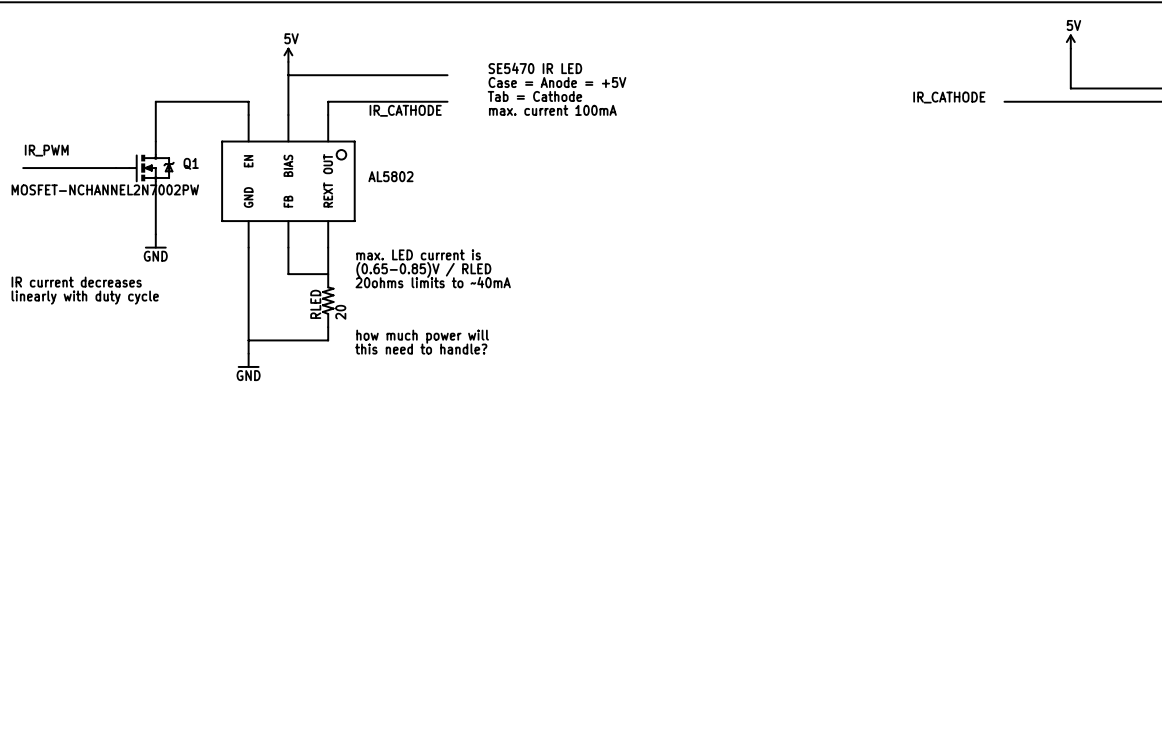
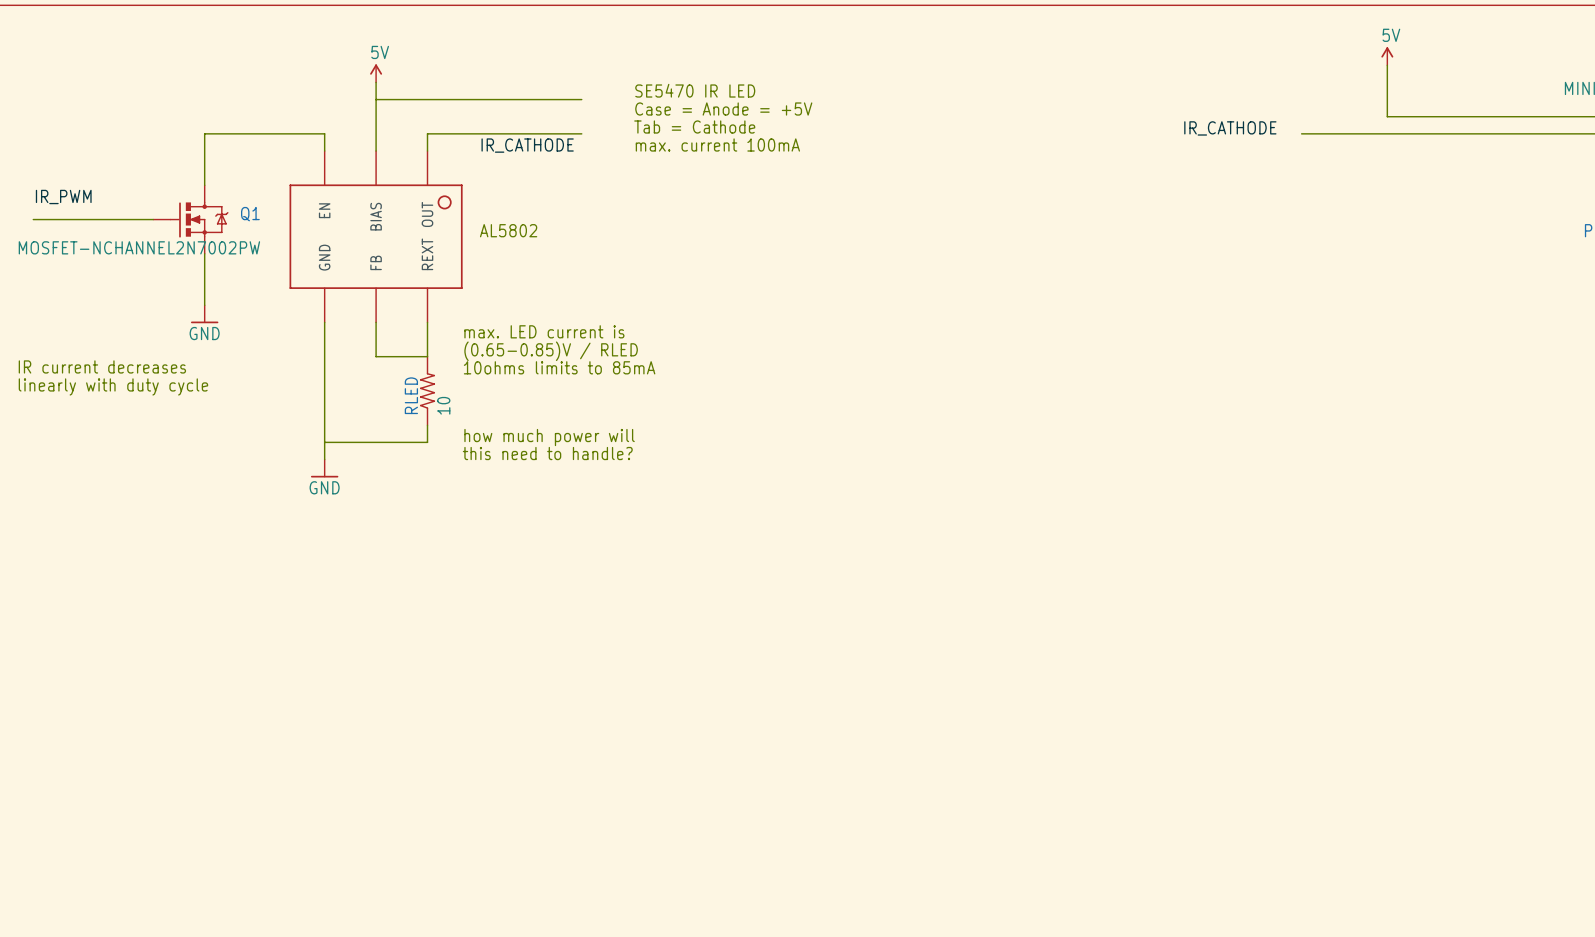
text: 20ohms limits to ~40mA (433, 282) -> 10ohms limits to 85mA (559, 367)
RLED value: 20 (340, 312) -> 10 (443, 405)

